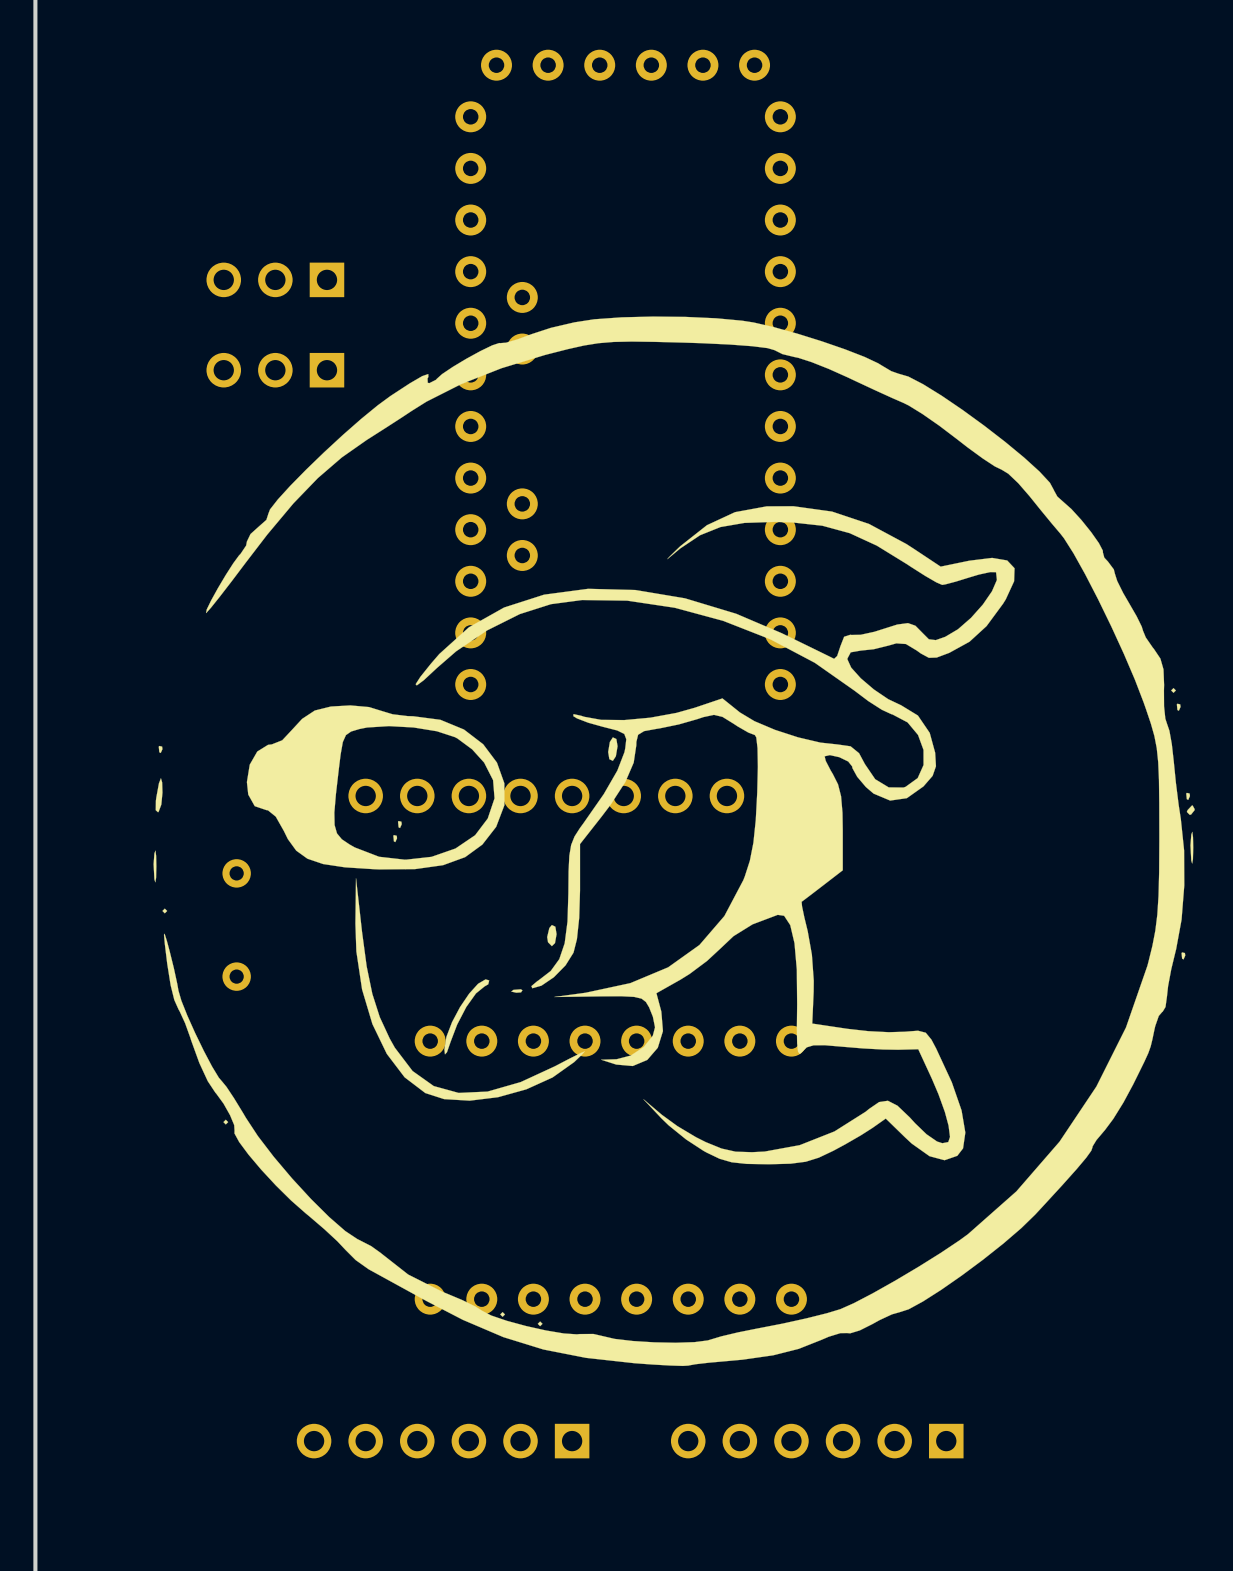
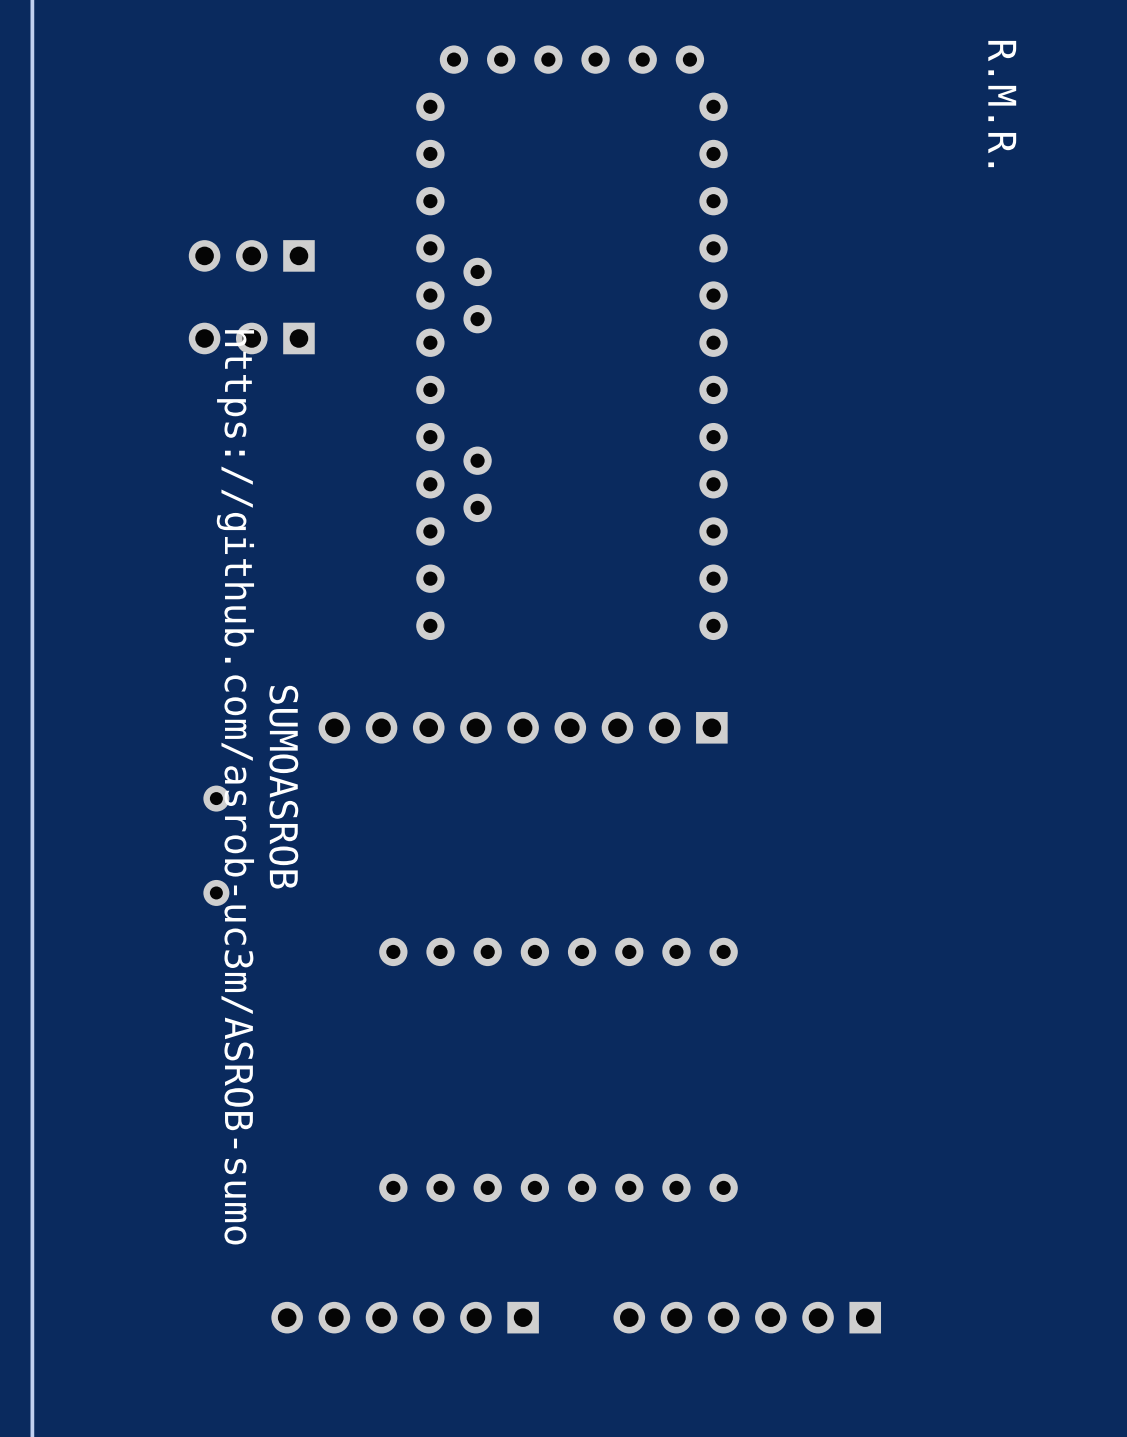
text: none -> R.M.R. (1002, 104)
drawing: [153, 316, 1195, 1367] -> none
text: none -> SUMOASROB (283, 787)
text: none -> https://github.com/asrob-uc3m/ASROB-sumo (235, 787)

